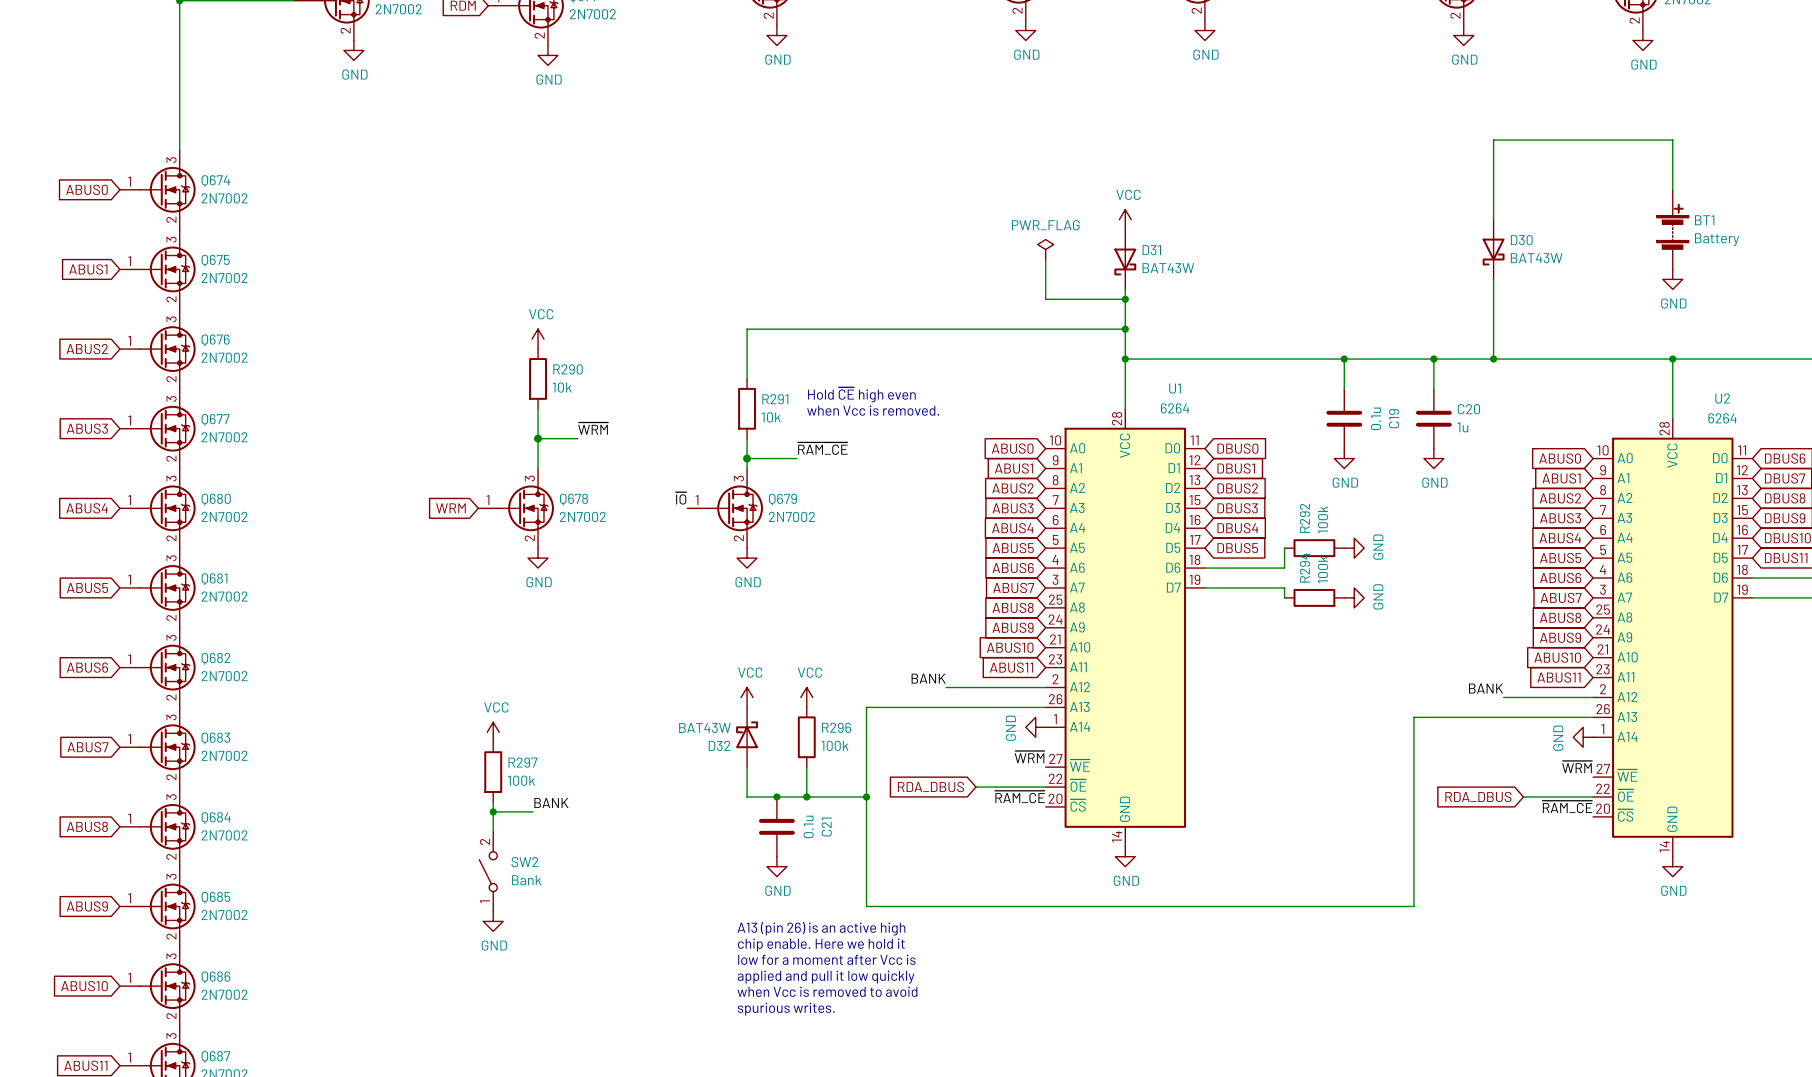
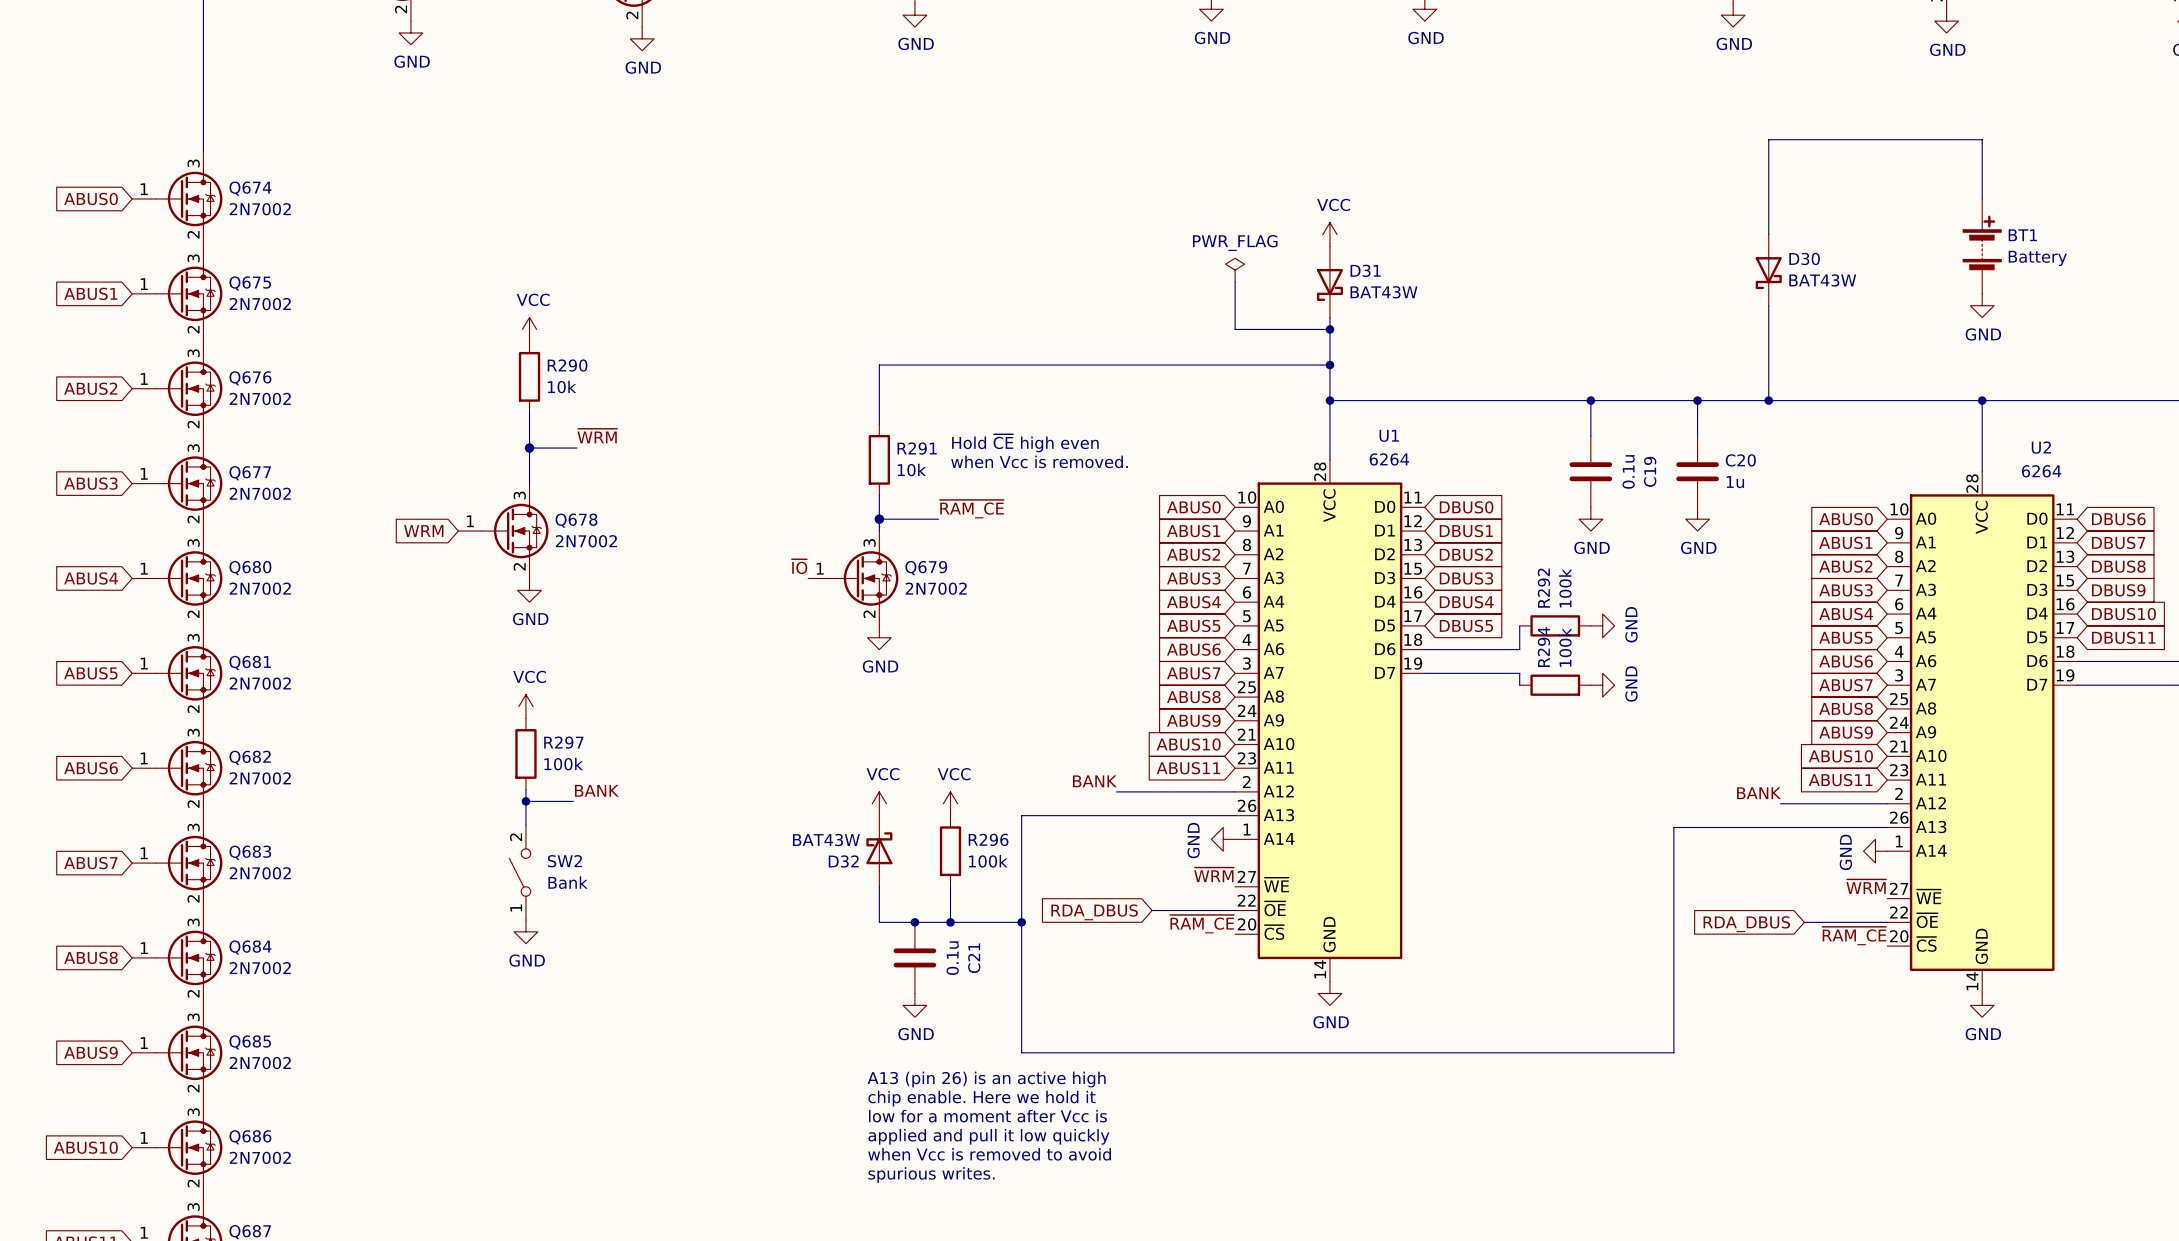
power symbol position: VCC (538, 339) -> VCC (529, 329)
R290 position: (538, 378) -> (529, 376)
junction: none -> (529, 448)
wire: (538, 408) (538, 468) -> (529, 412) (529, 483)
label position: ~{WRM} (593, 428) -> ~{WRM} (597, 436)
wire: (538, 438) (577, 438) -> (529, 448) (576, 448)
junction: (538, 438) -> none
global label position: WRM (450, 508) -> WRM (423, 531)
Q678 position: (516, 508) -> (503, 531)
power symbol position: GND (538, 558) -> GND (529, 590)
junction: none -> (525, 801)
power symbol position: VCC (493, 732) -> VCC (525, 706)
R297 position: (493, 772) -> (525, 753)
wire: (493, 801) (493, 831) -> (525, 789) (525, 825)
label position: BANK (551, 803) -> BANK (596, 790)
wire: (493, 811) (533, 811) -> (525, 801) (573, 801)
junction: (493, 811) -> none
SW2 position: (488, 871) -> (520, 872)
power symbol position: GND (493, 921) -> GND (525, 931)

